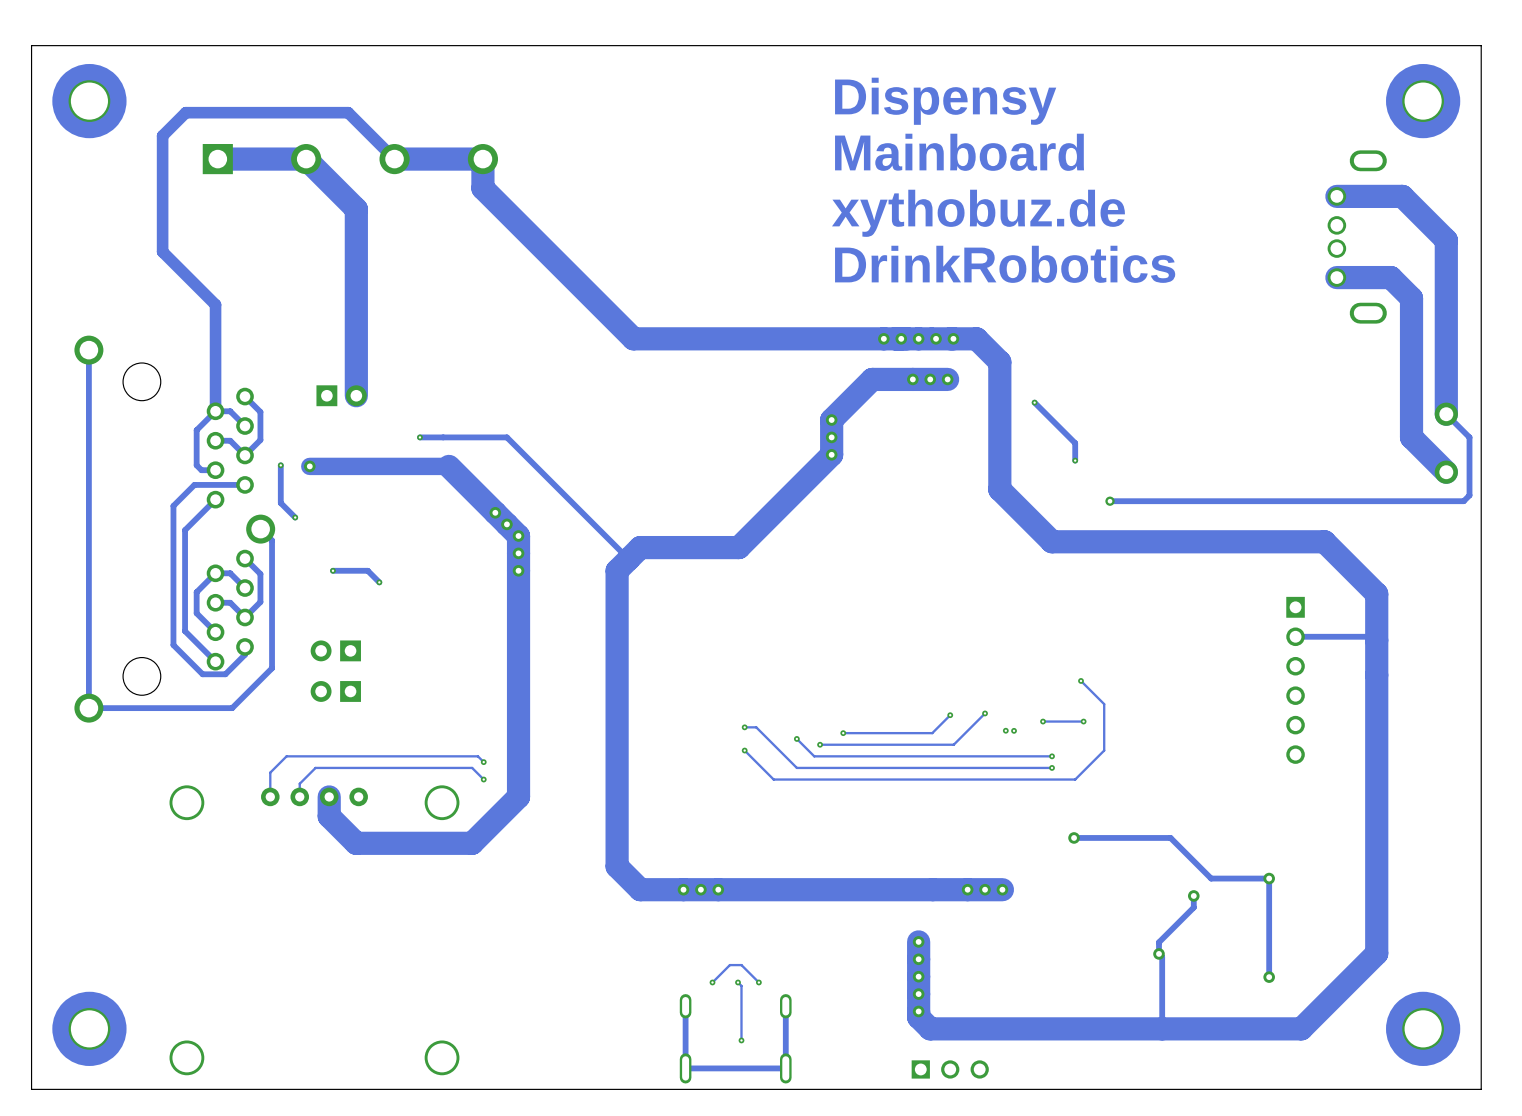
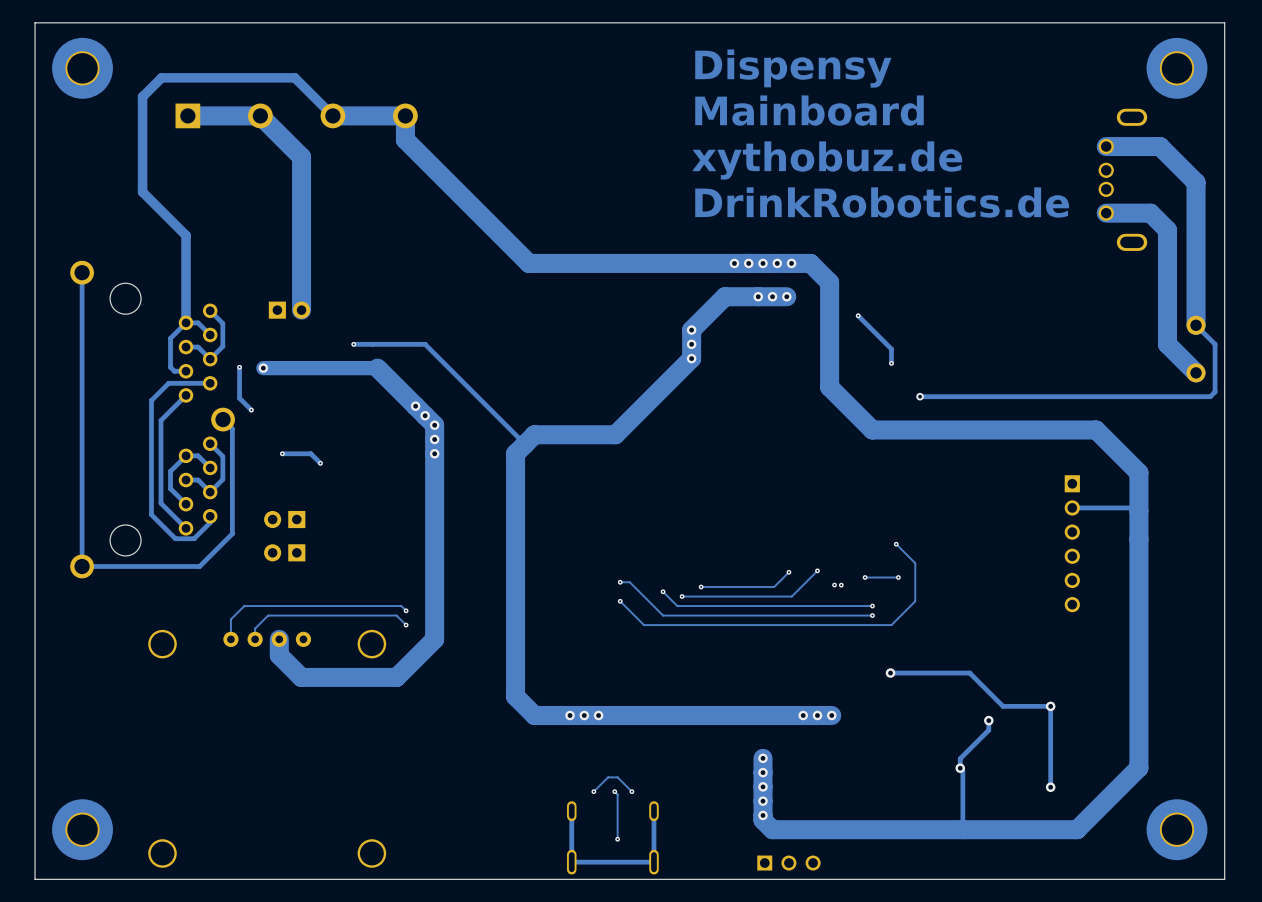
text: DrinkRobotics (1005, 264) -> DrinkRobotics.de (882, 202)

